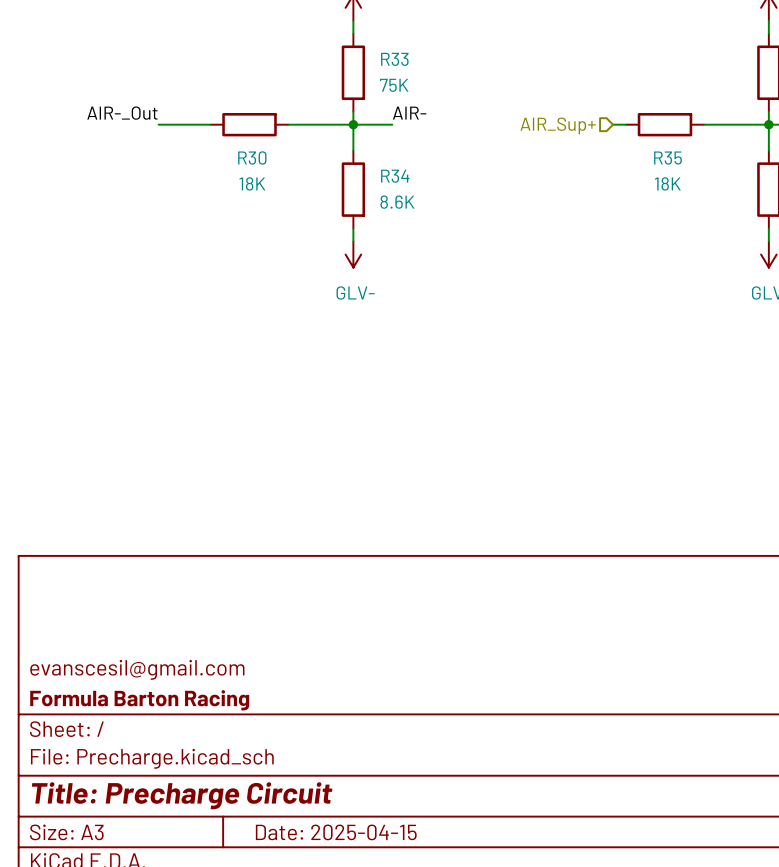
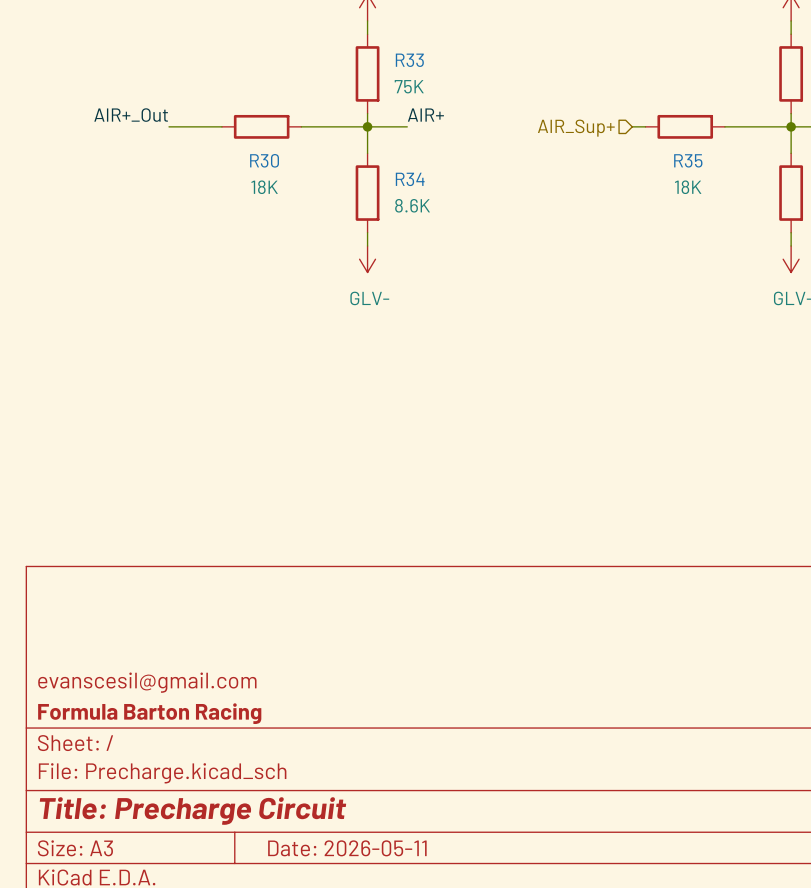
label: AIR-_Out (122, 113) -> AIR+_Out (131, 115)
label: AIR- (409, 113) -> AIR+ (425, 115)
title block: Date: 2025-04-15 (336, 832) -> Date: 2026-05-11 (347, 848)

